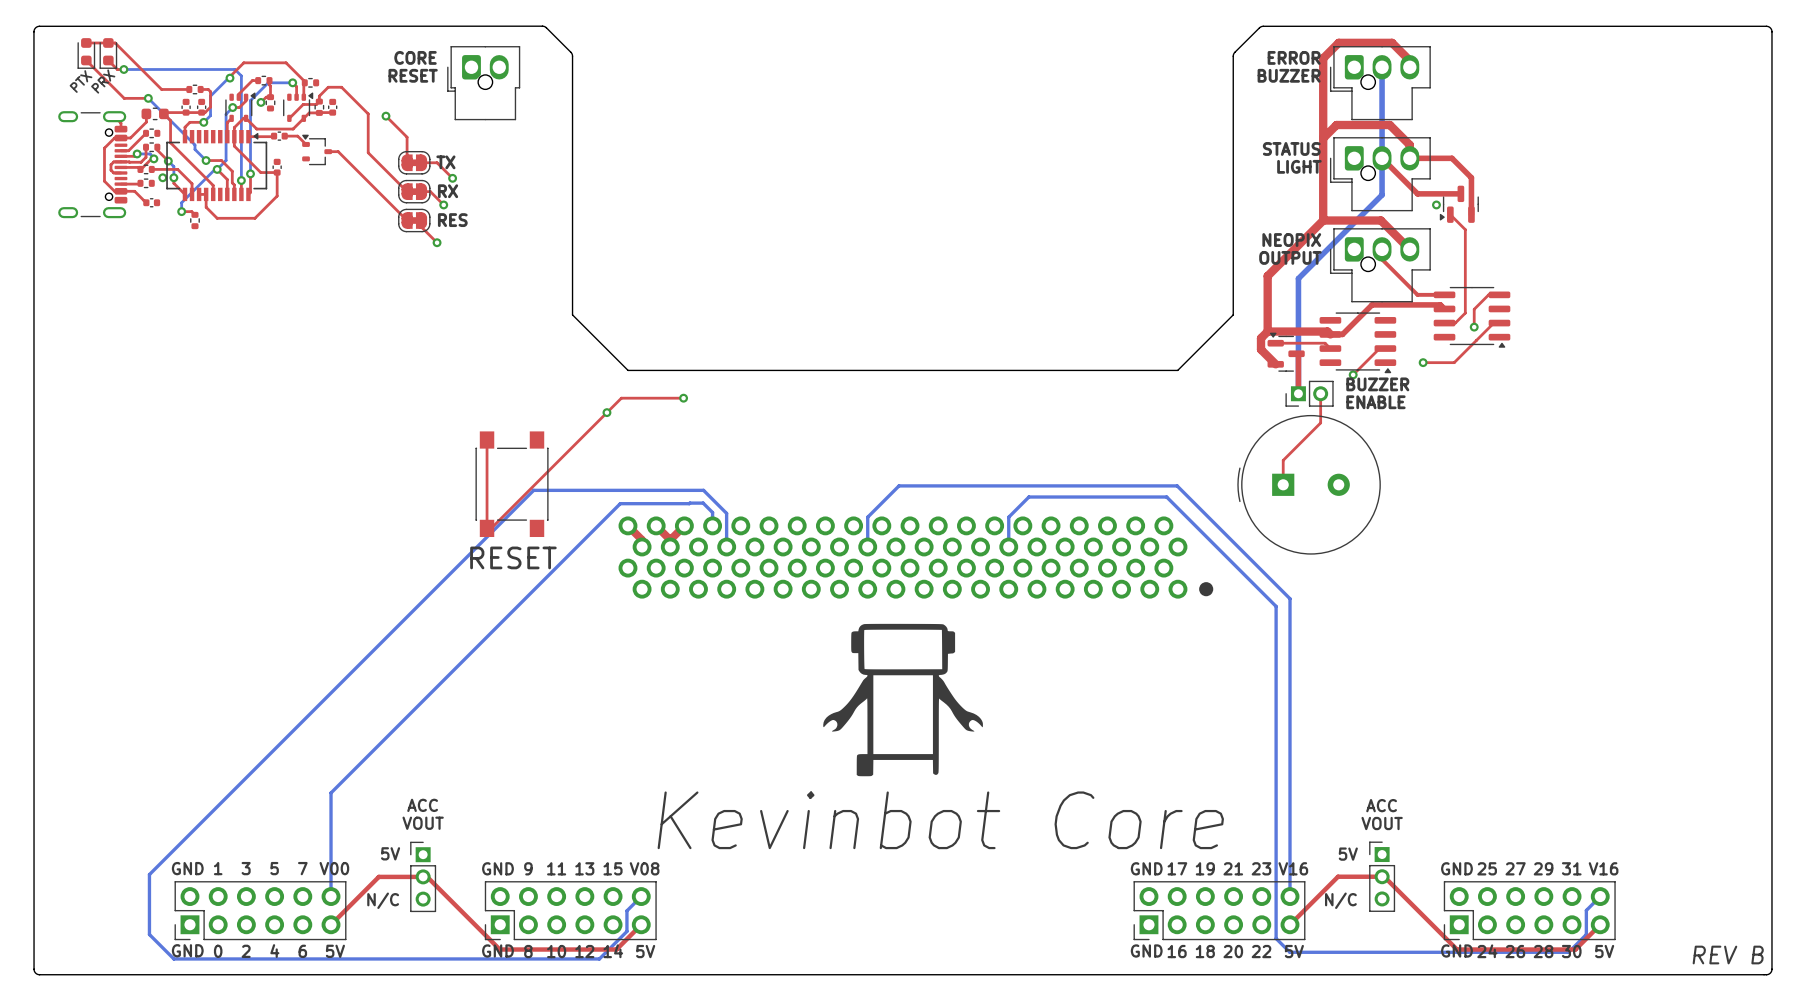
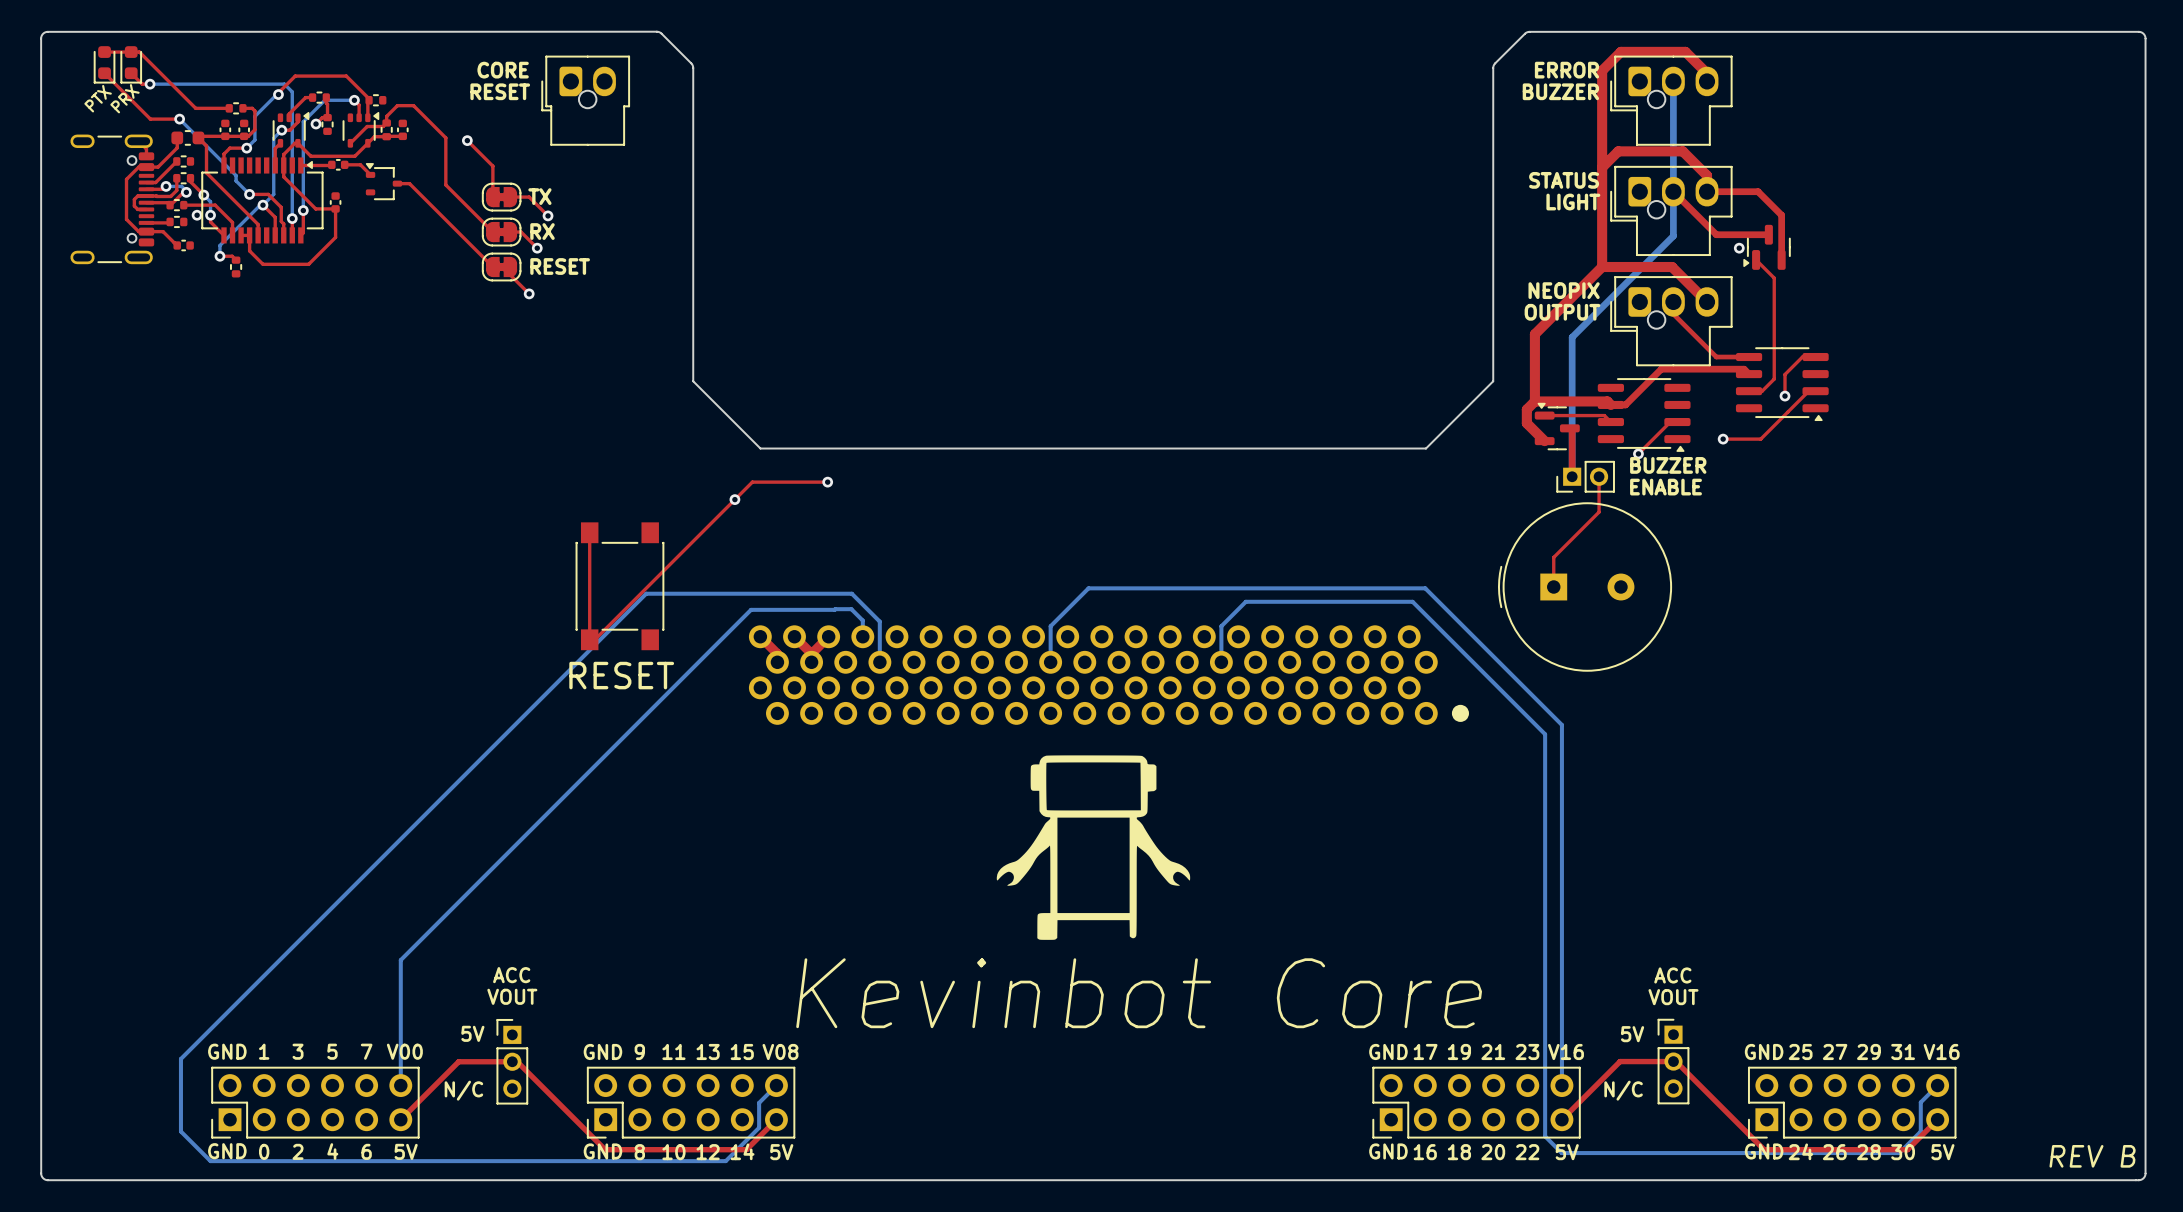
text: RES (452, 220) -> RESET (560, 266)

